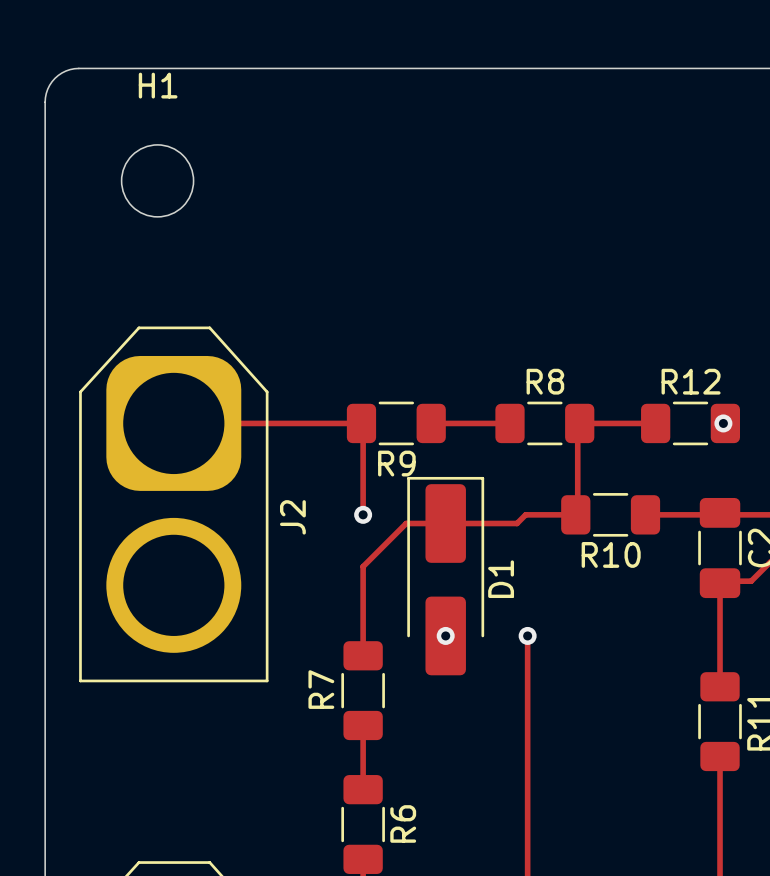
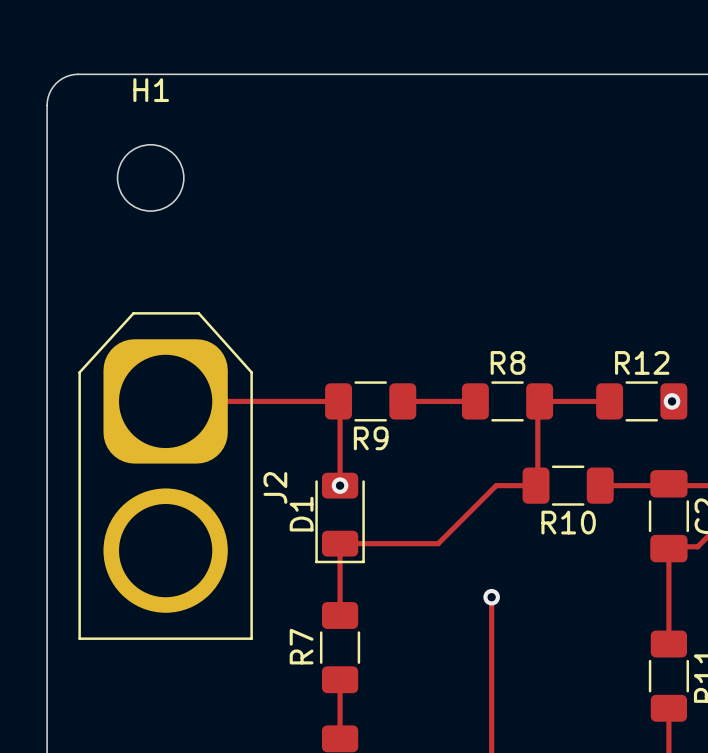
D1 footprint: [407, 476, 485, 676] -> [315, 472, 365, 564]
track: (532, 514) (525, 514) (517, 523) (406, 523) (363, 566) (363, 577) -> (496, 485) (438, 543) (340, 543)
D1 name position: D1 (501, 579) -> D1 (301, 514)
via: (445, 635) -> none

